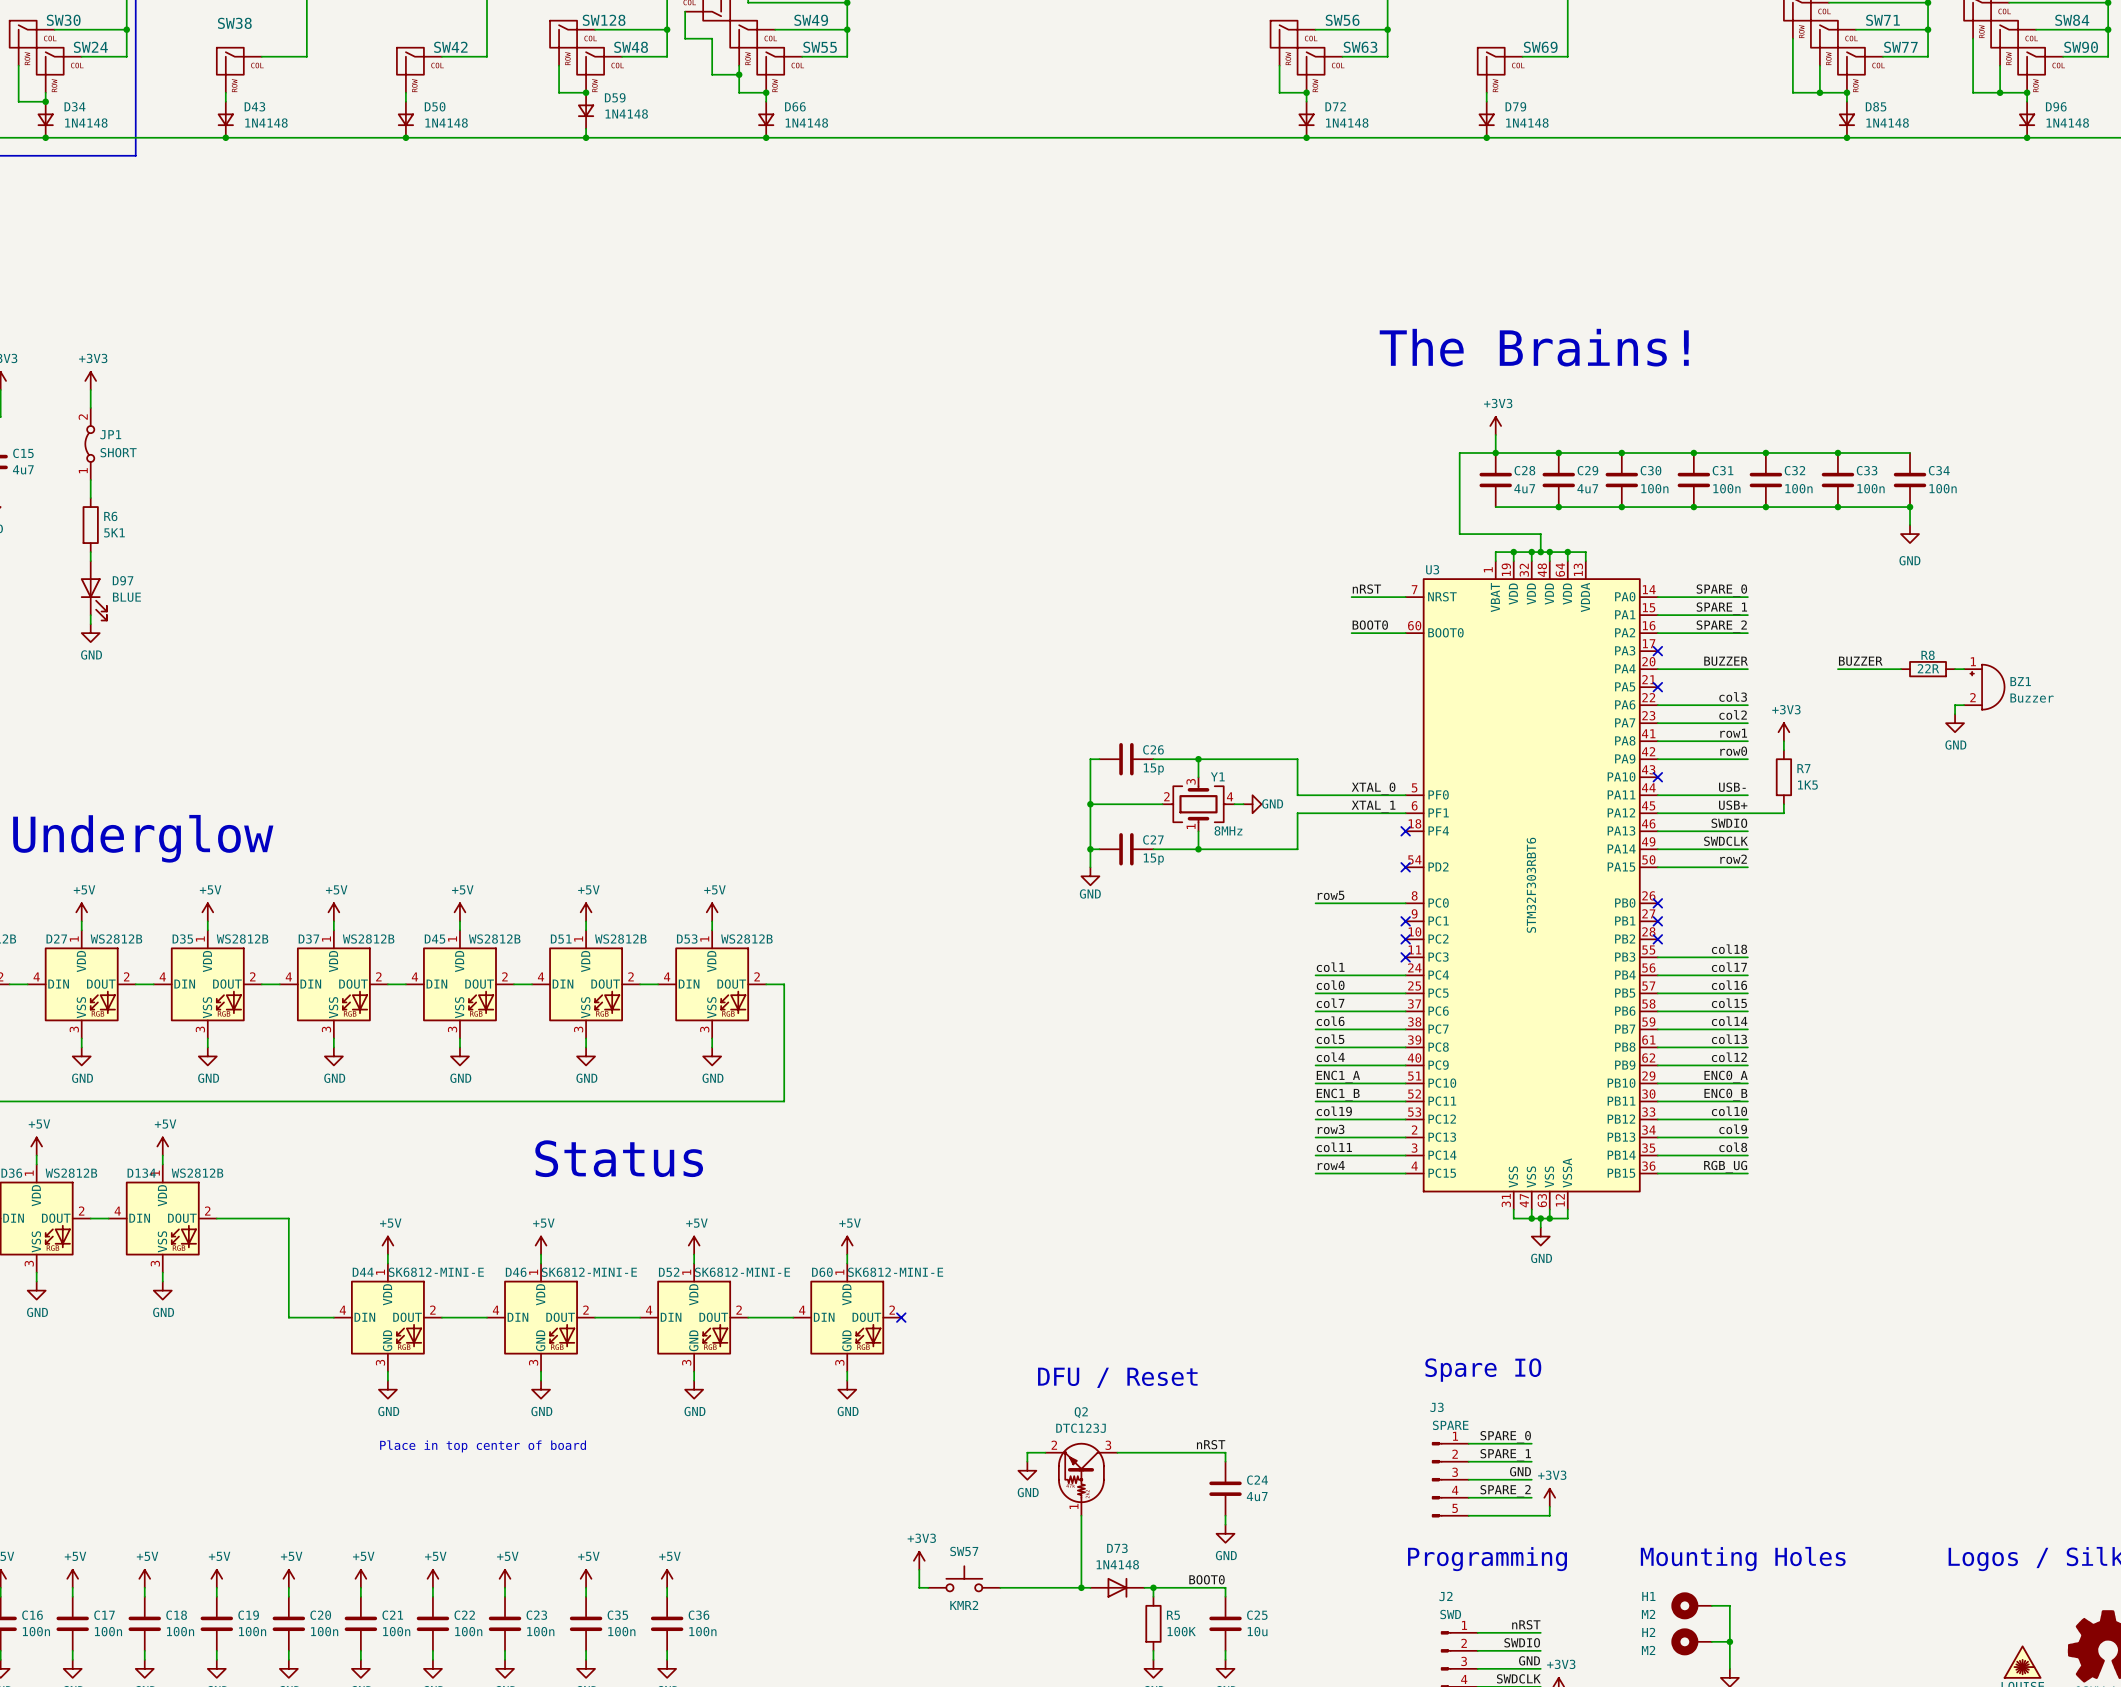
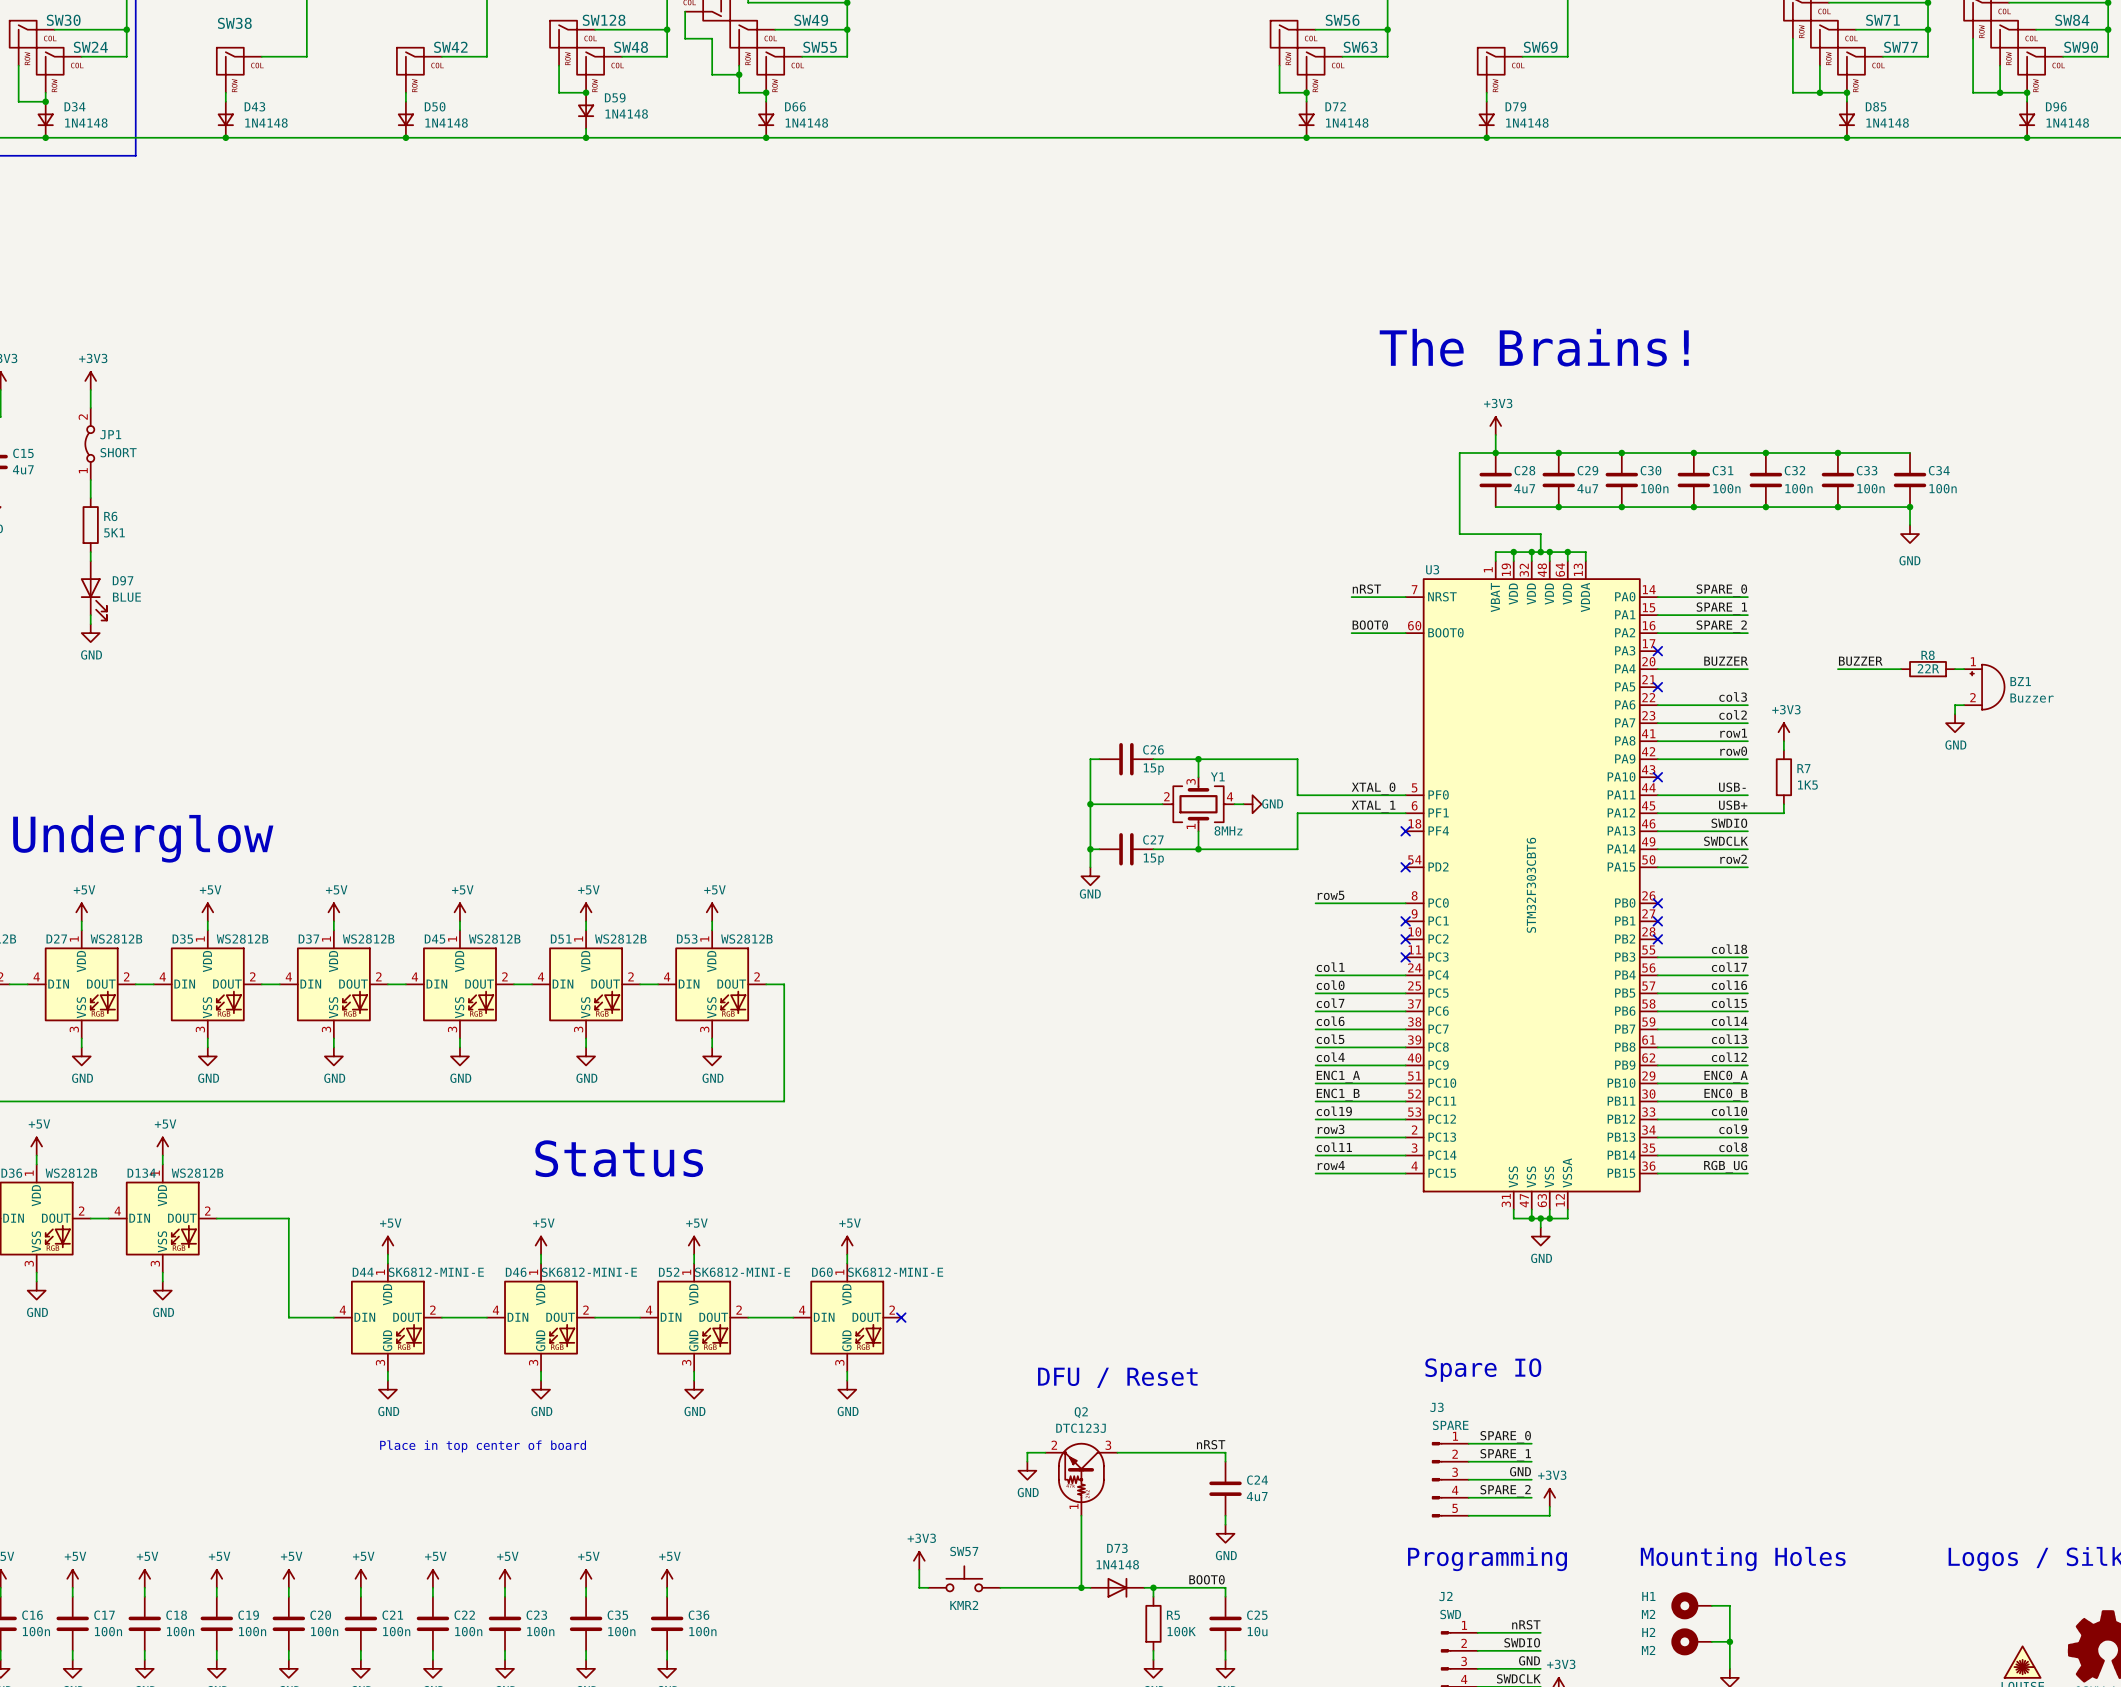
U3 value: STM32F303RBT6 (1531, 885) -> STM32F303CBT6 (1531, 885)

